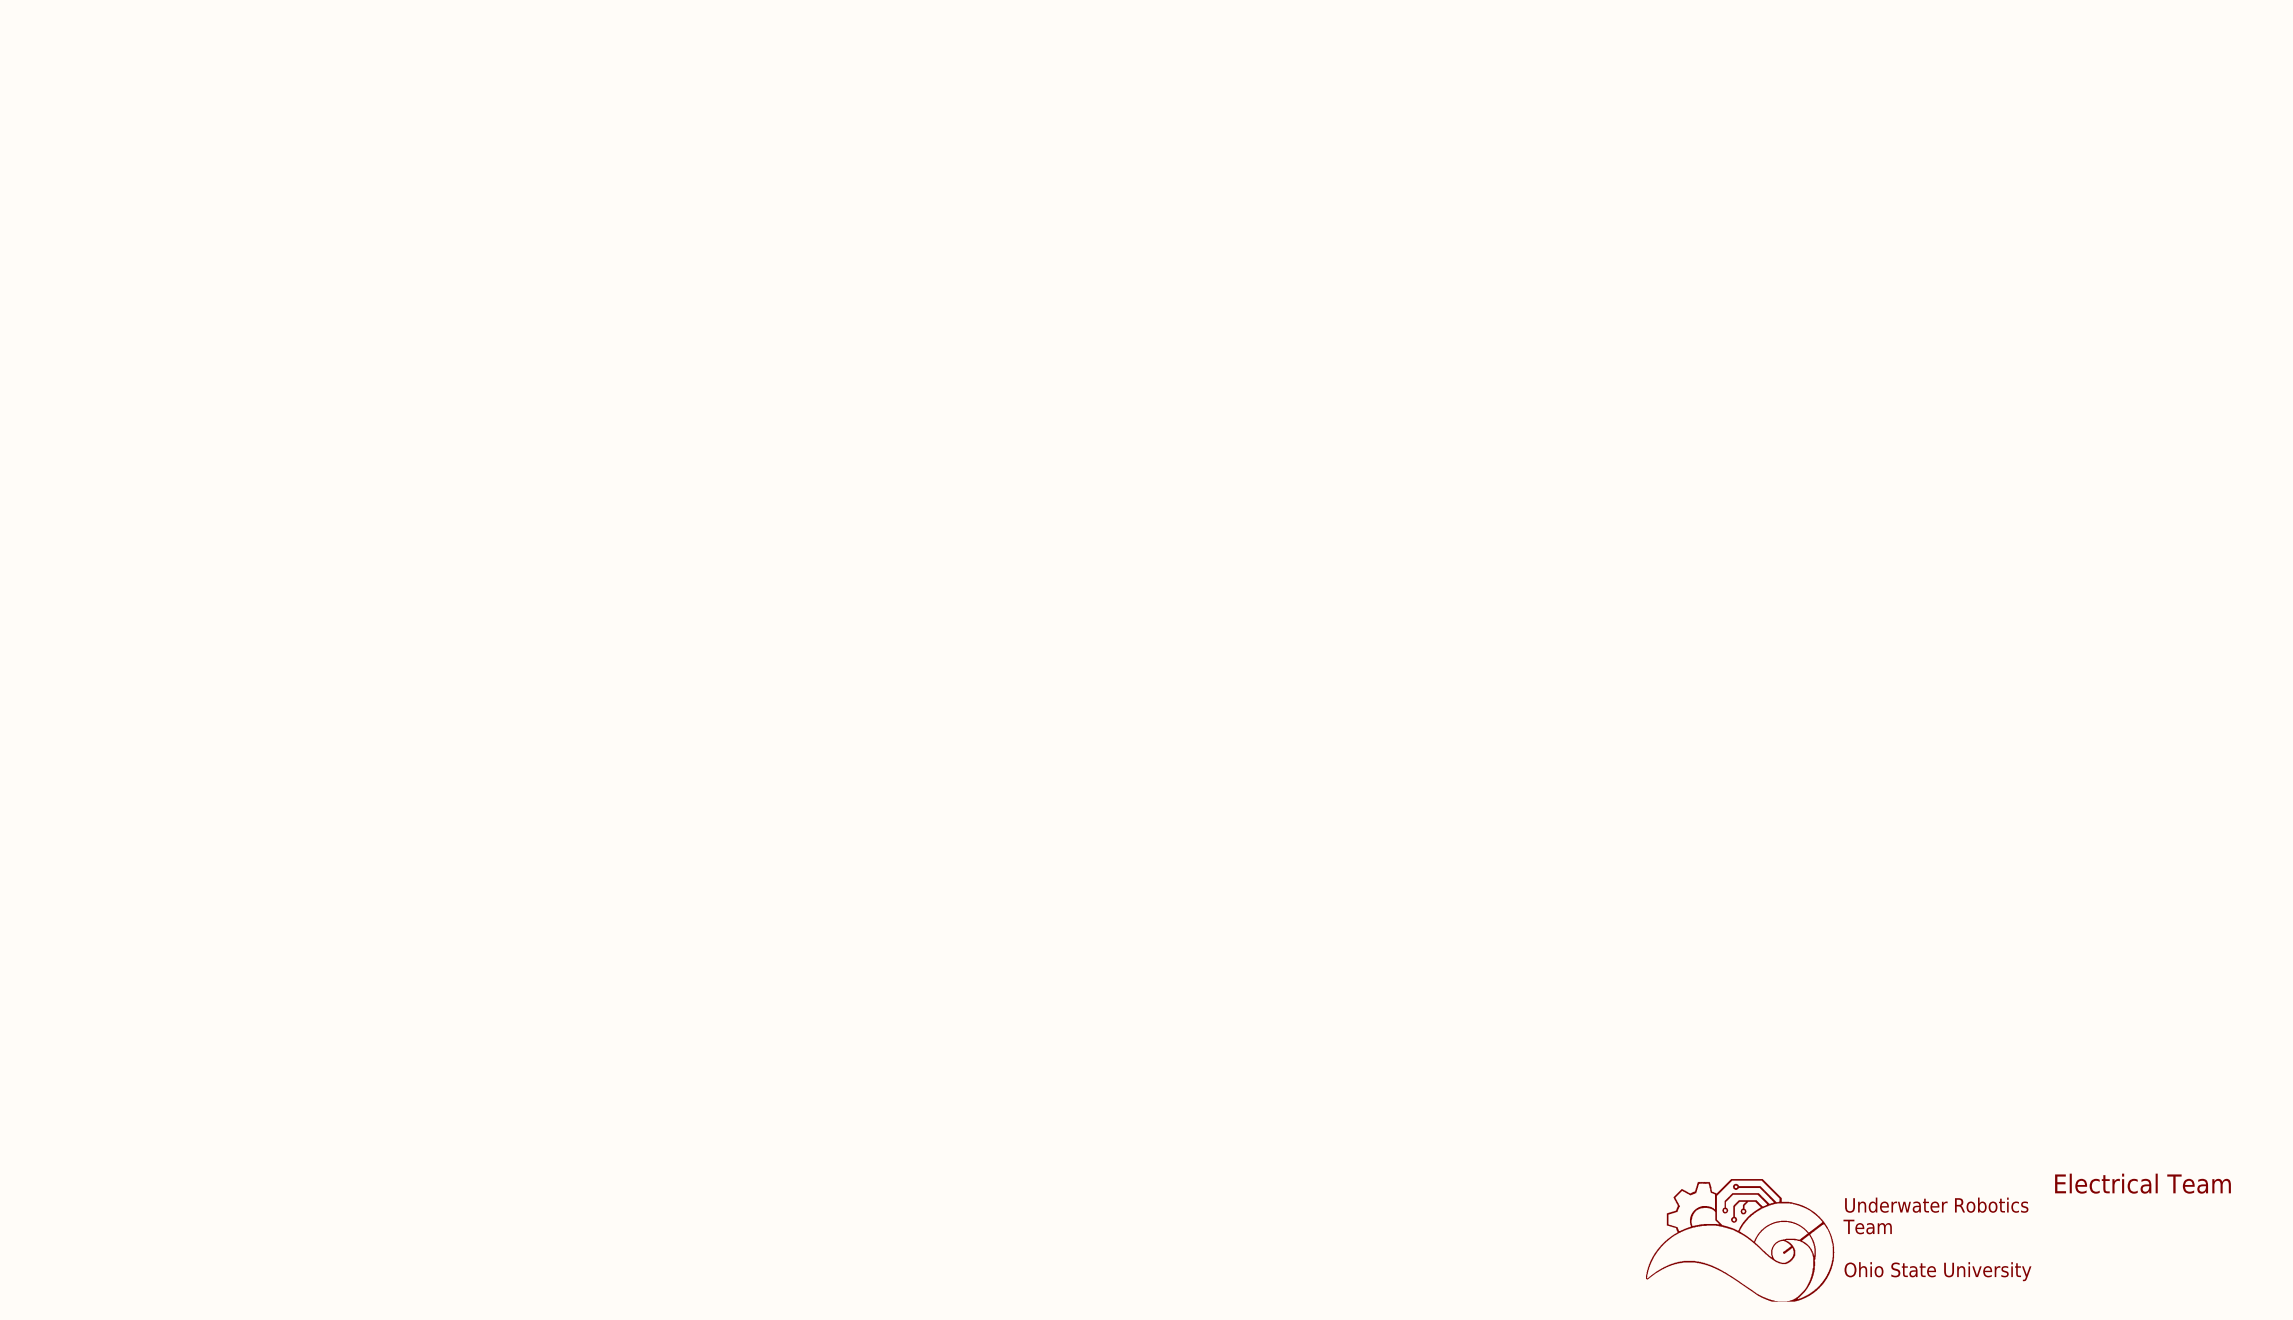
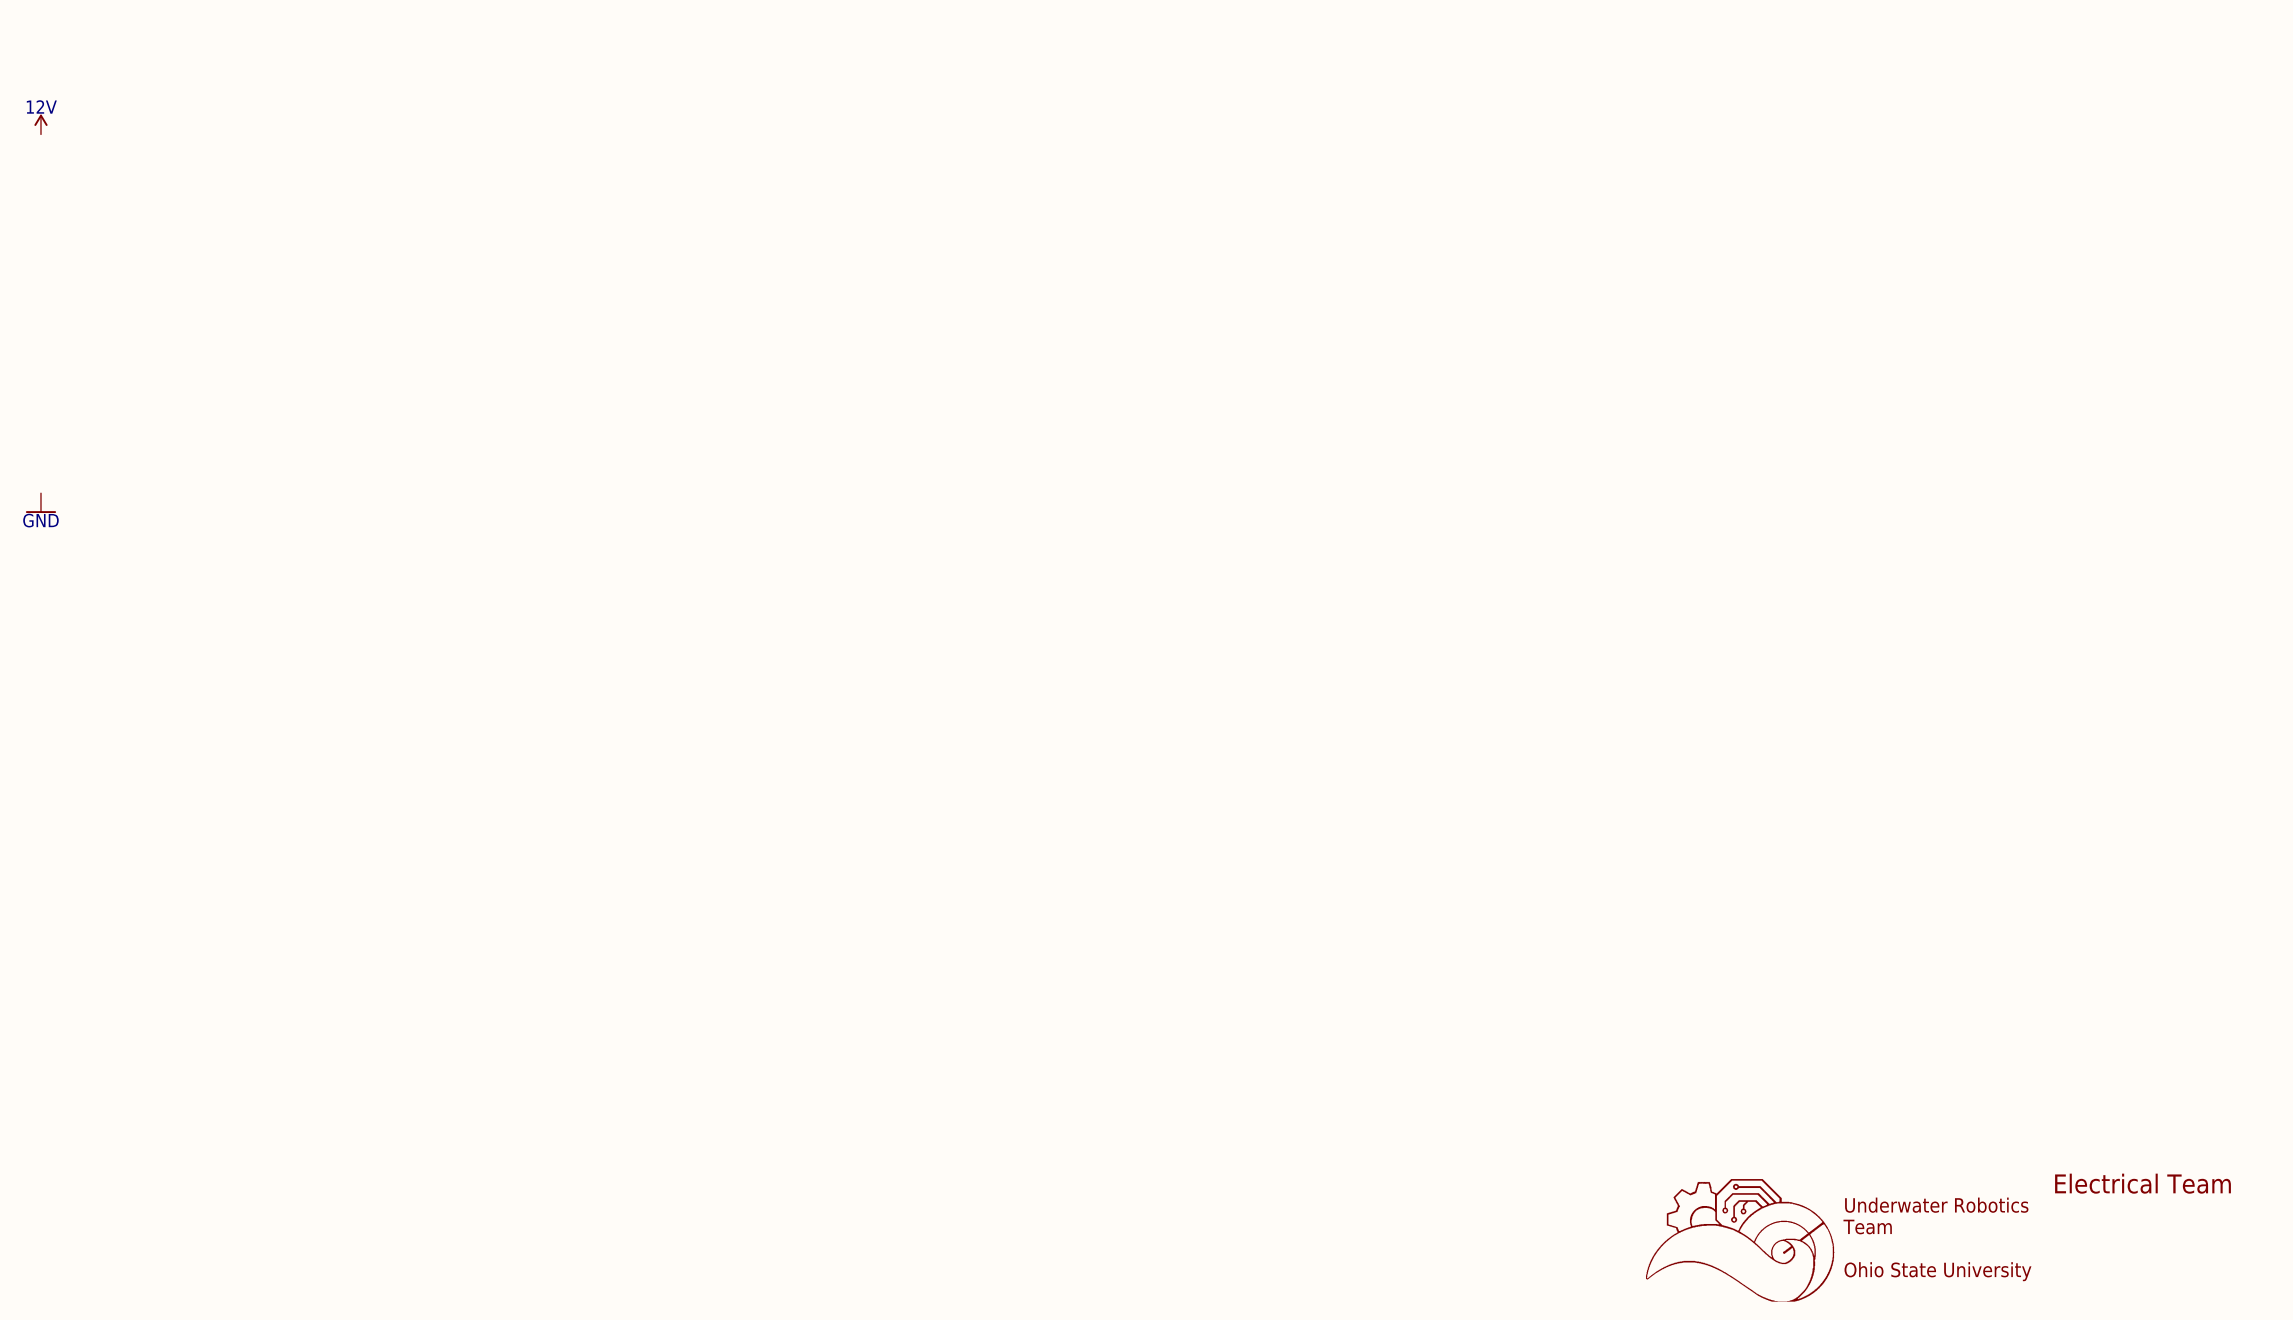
power symbol: none -> 12V (40, 124)
power symbol: none -> GND (40, 503)

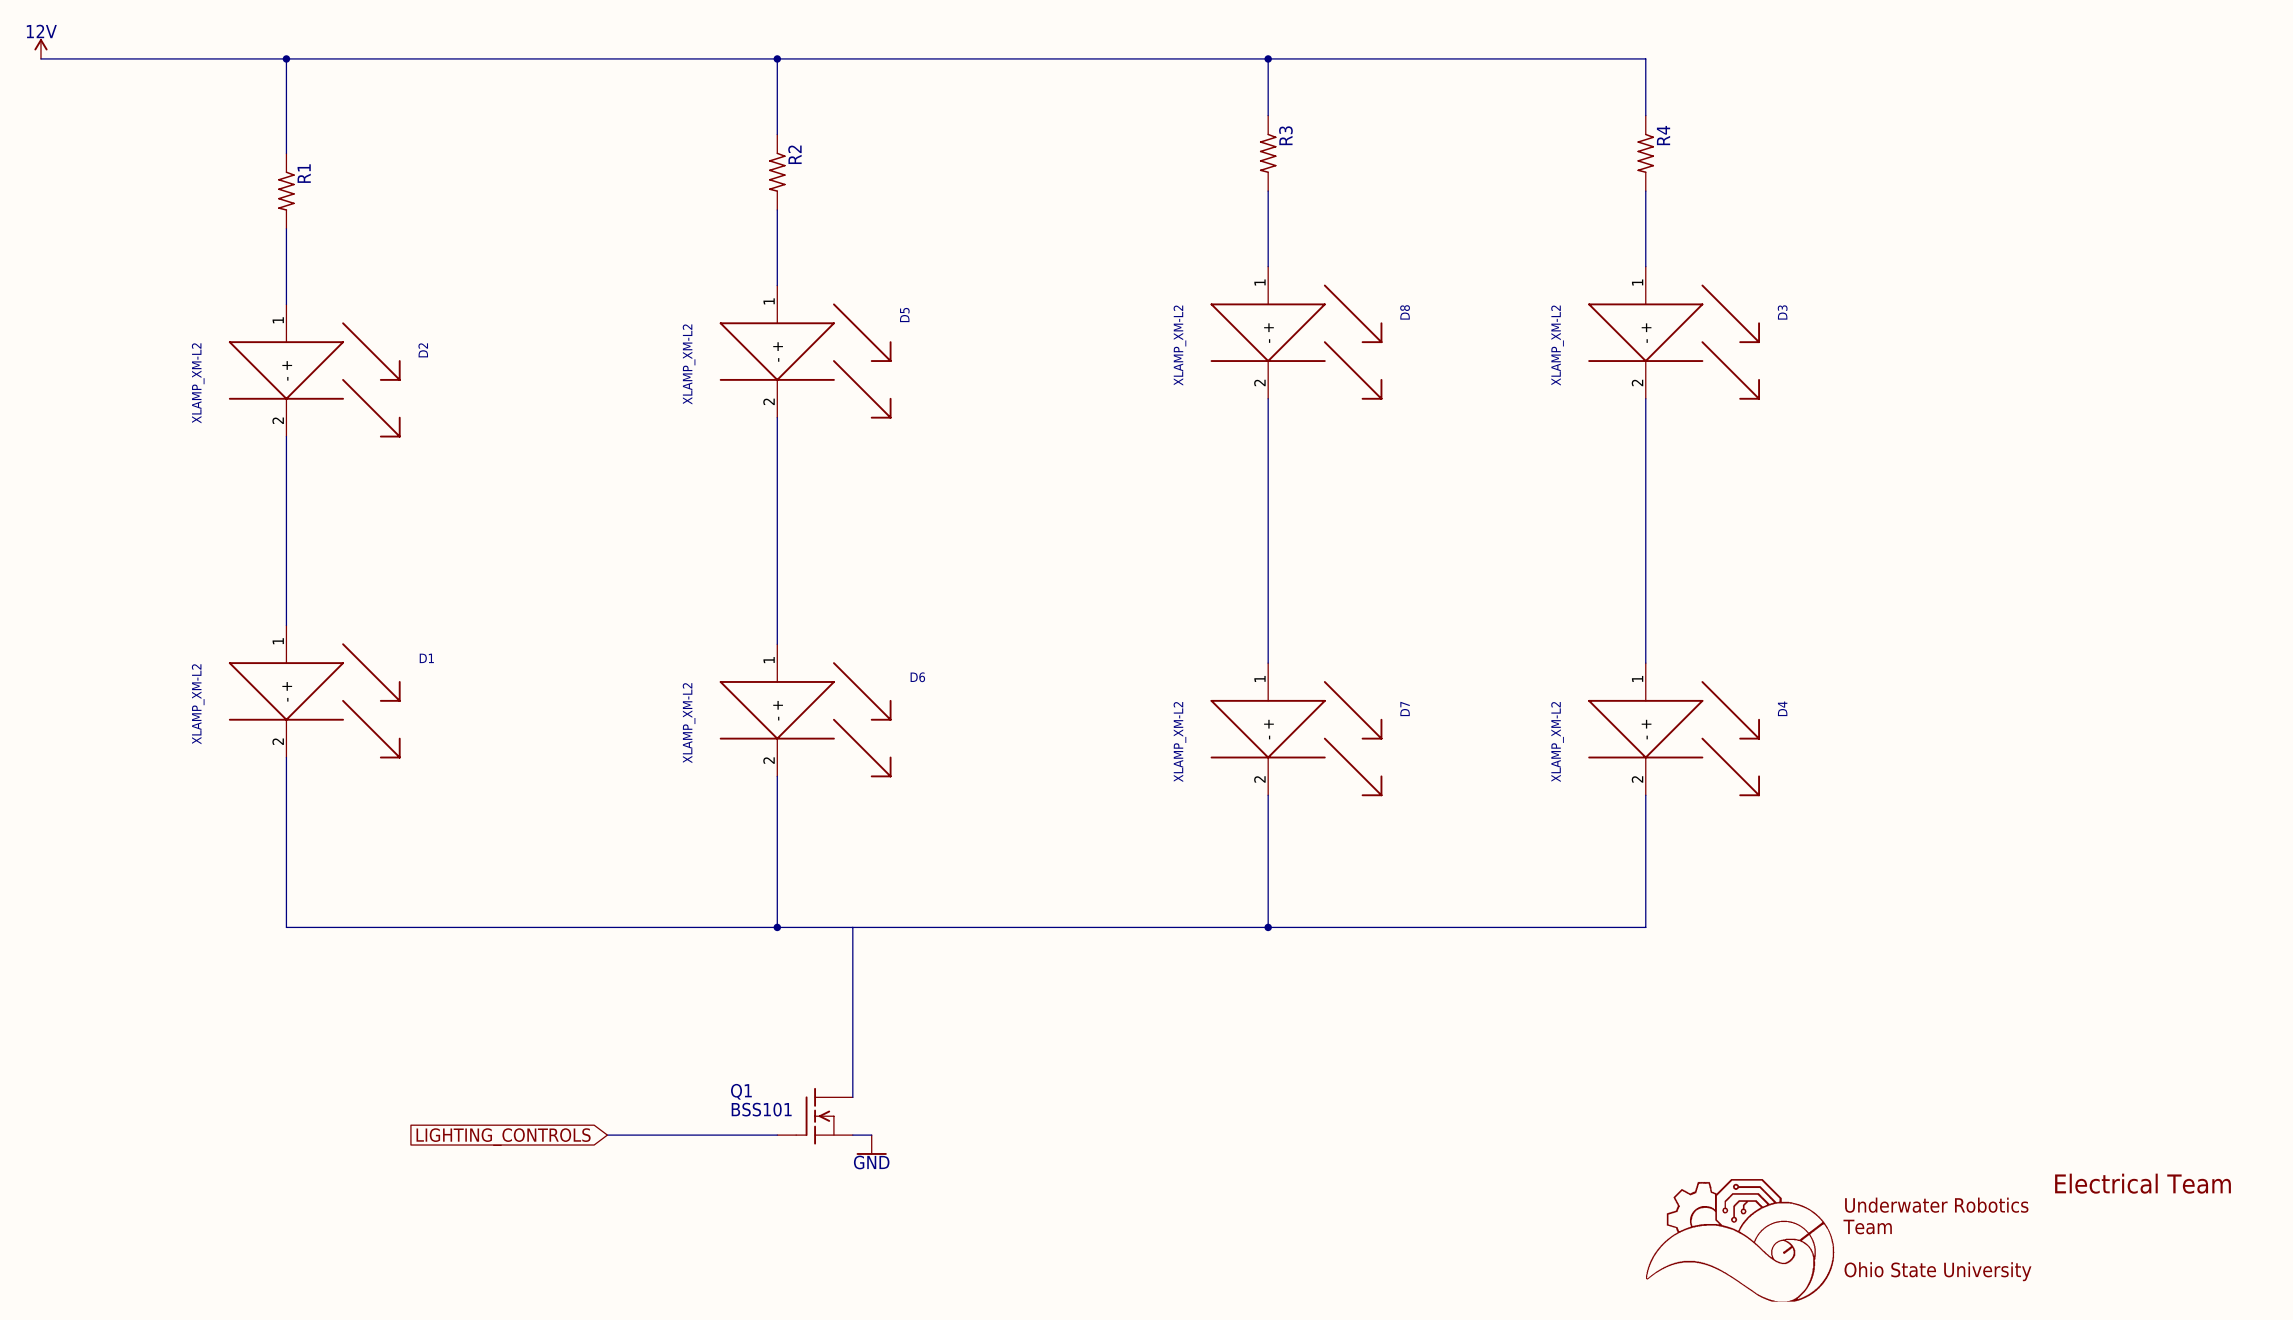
wire: none -> (40, 58) (1645, 58) (1645, 115)
wire: none -> (286, 58) (286, 153)
junction: none -> (286, 58)
wire: none -> (777, 58) (777, 134)
junction: none -> (777, 58)
wire: none -> (1268, 58) (1268, 115)
junction: none -> (1268, 58)
power symbol position: 12V (40, 124) -> 12V (40, 49)
R3: none -> (1268, 153)
R4: none -> (1645, 153)
R2: none -> (777, 172)
R1: none -> (286, 191)
wire: none -> (1268, 191) (1268, 266)
wire: none -> (1645, 191) (1645, 266)
wire: none -> (777, 209) (777, 285)
wire: none -> (286, 228) (286, 304)
D8: none -> XLAMP_XM-L2 (1296, 333)
D3: none -> XLAMP_XM-L2 (1674, 333)
D5: none -> XLAMP_XM-L2 (805, 352)
D2: none -> XLAMP_XM-L2 (314, 370)
wire: none -> (1268, 398) (1268, 663)
wire: none -> (1645, 398) (1645, 663)
wire: none -> (777, 417) (777, 644)
wire: none -> (286, 436) (286, 625)
power symbol: GND (40, 503) -> none
D1: none -> XLAMP_XM-L2 (314, 691)
D6: none -> XLAMP_XM-L2 (805, 710)
D7: none -> XLAMP_XM-L2 (1296, 729)
D4: none -> XLAMP_XM-L2 (1674, 729)
wire: none -> (286, 757) (286, 927) (1645, 927) (1645, 795)
wire: none -> (777, 776) (777, 927)
wire: none -> (1268, 795) (1268, 927)
junction: none -> (777, 927)
wire: none -> (852, 927) (852, 1097)
junction: none -> (1268, 927)
Q1: none -> BSS101 (815, 1116)
wire: none -> (607, 1135) (777, 1135)
wire: none -> (852, 1135) (871, 1135)
global label: none -> LIGHTING_CONTROLS (503, 1137)
power symbol: none -> GND (871, 1145)

